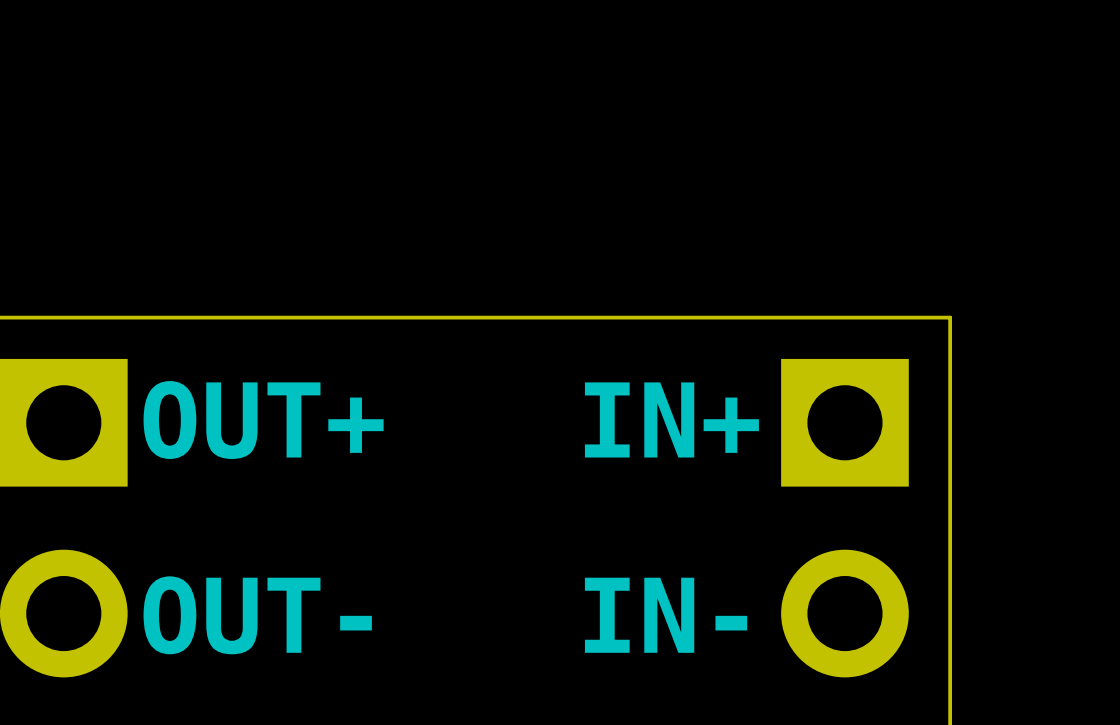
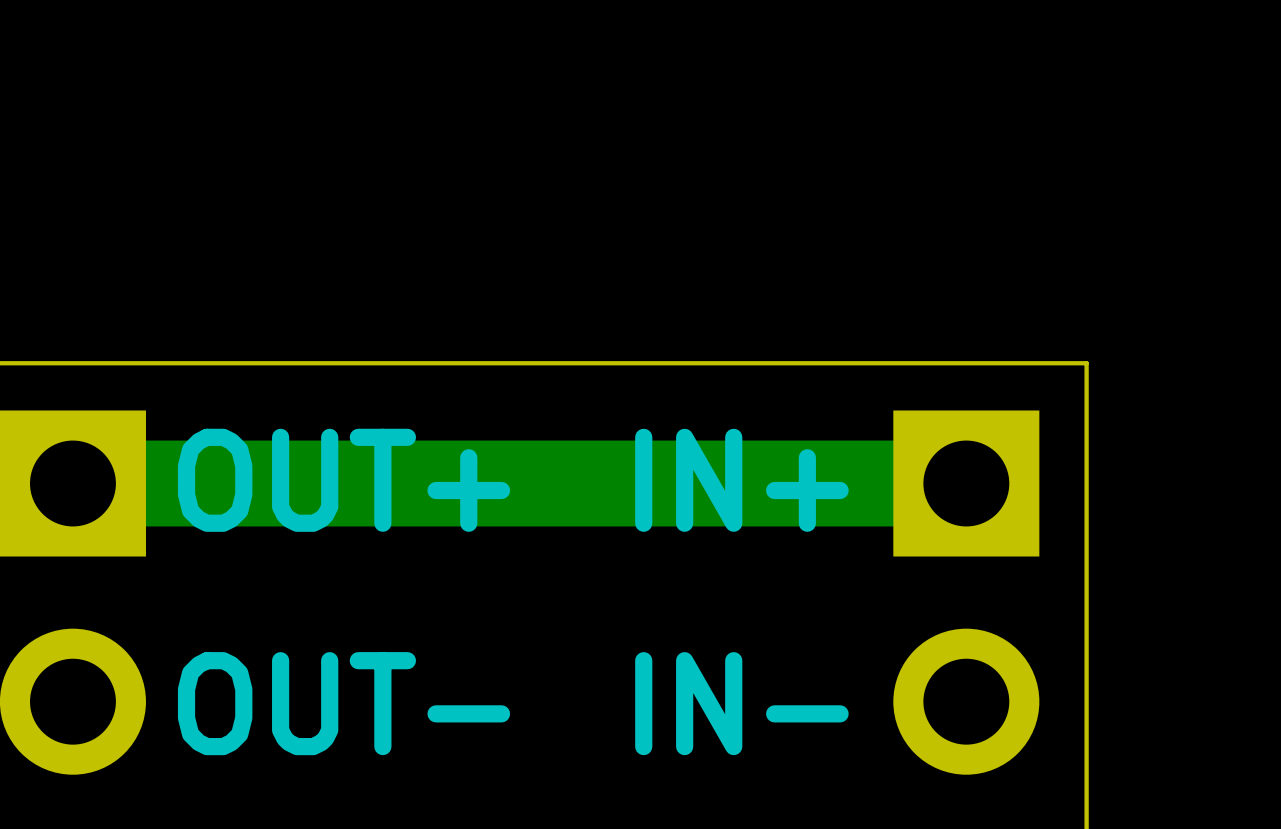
track: none -> (966, 483) (72, 483)

